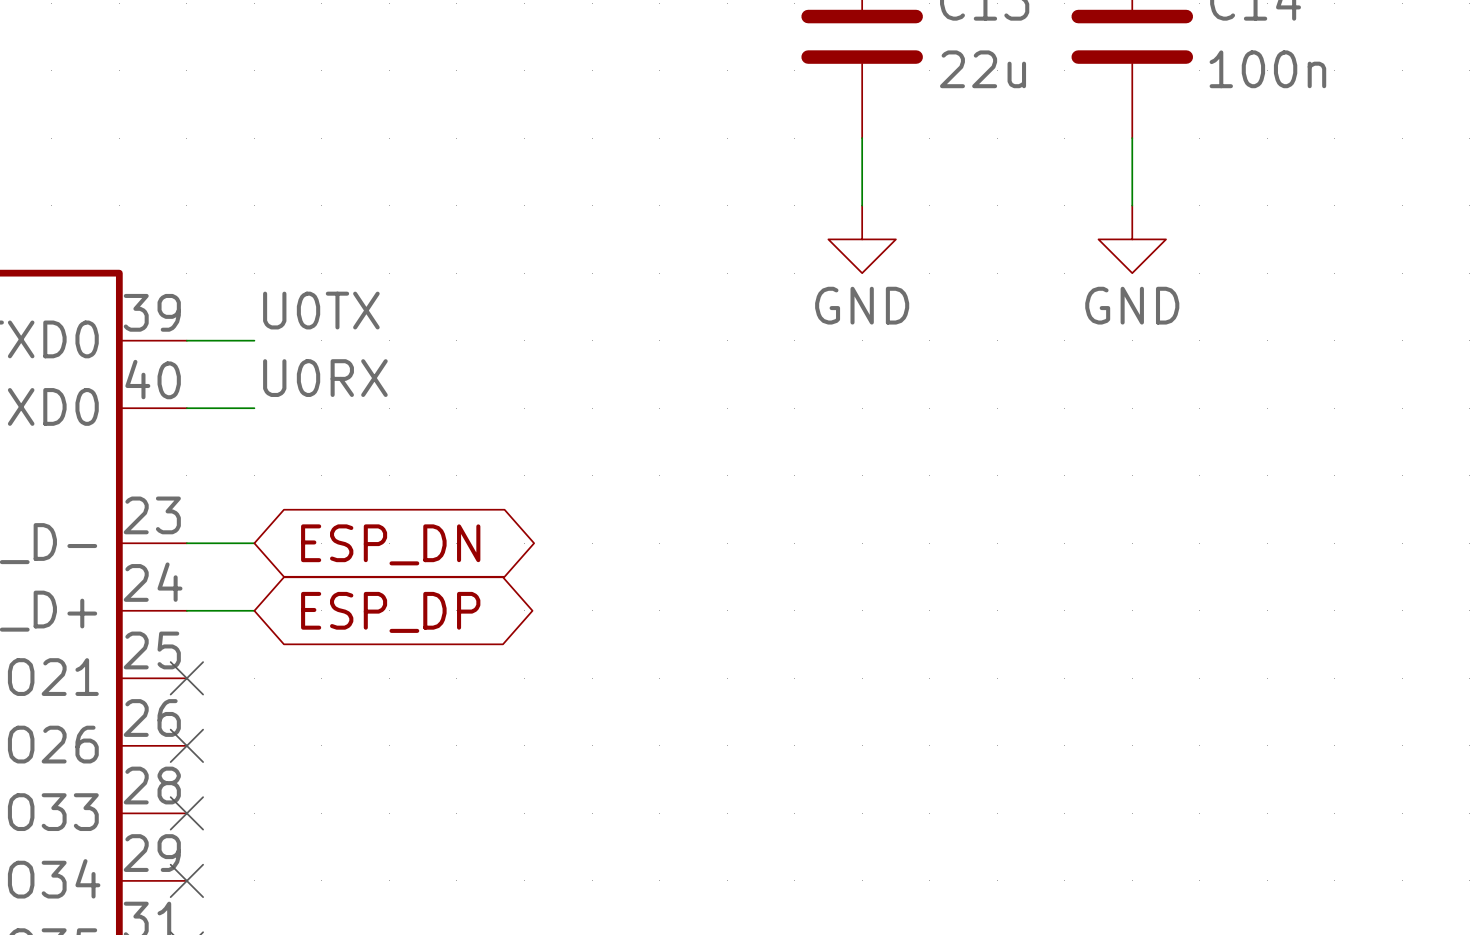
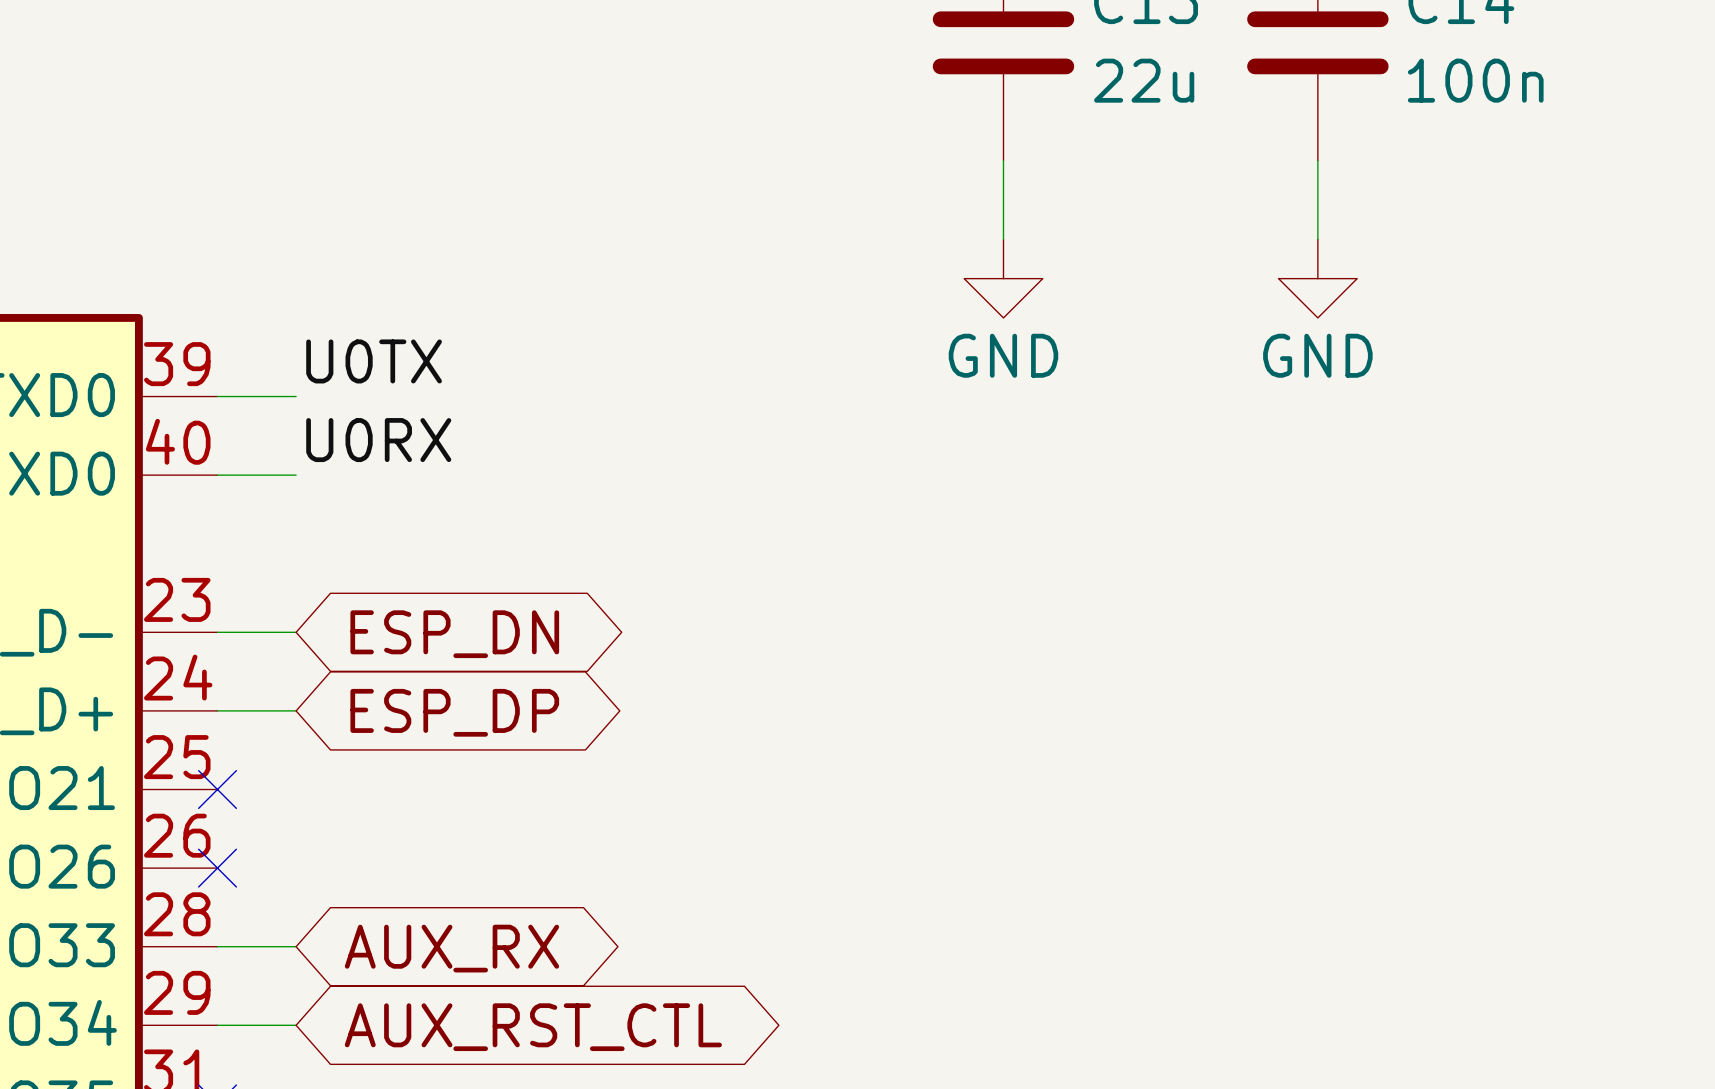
wire: none -> (217, 946) (296, 946)
no-connect mark: (186, 813) -> none
global label: none -> AUX_RX (451, 948)
wire: none -> (217, 1025) (296, 1025)
no-connect mark: (186, 880) -> none
global label: none -> AUX_RST_CTL (533, 1027)

